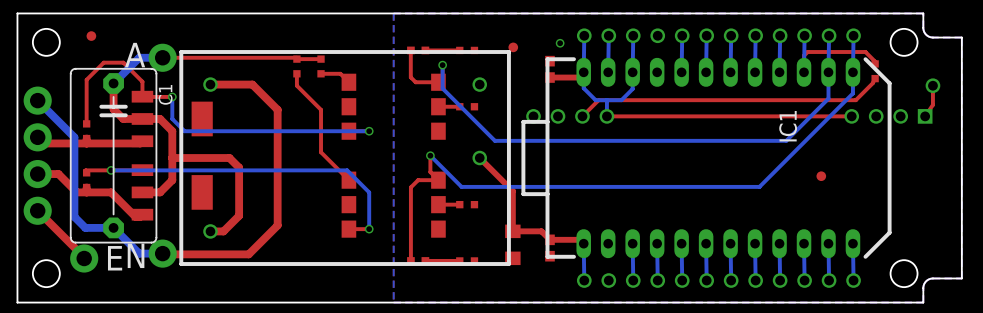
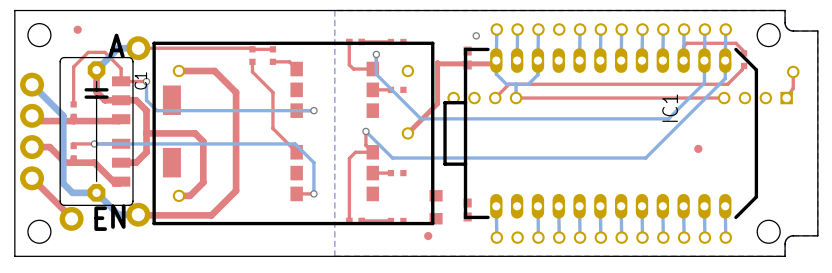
part position: (513, 47) -> (428, 236)
top track: (579, 76) (549, 77) -> (493, 63) (437, 62) (437, 103) (407, 133)
top track: (479, 158) (512, 191) (512, 231) (541, 231) (549, 239) (579, 239) (583, 243) -> none

